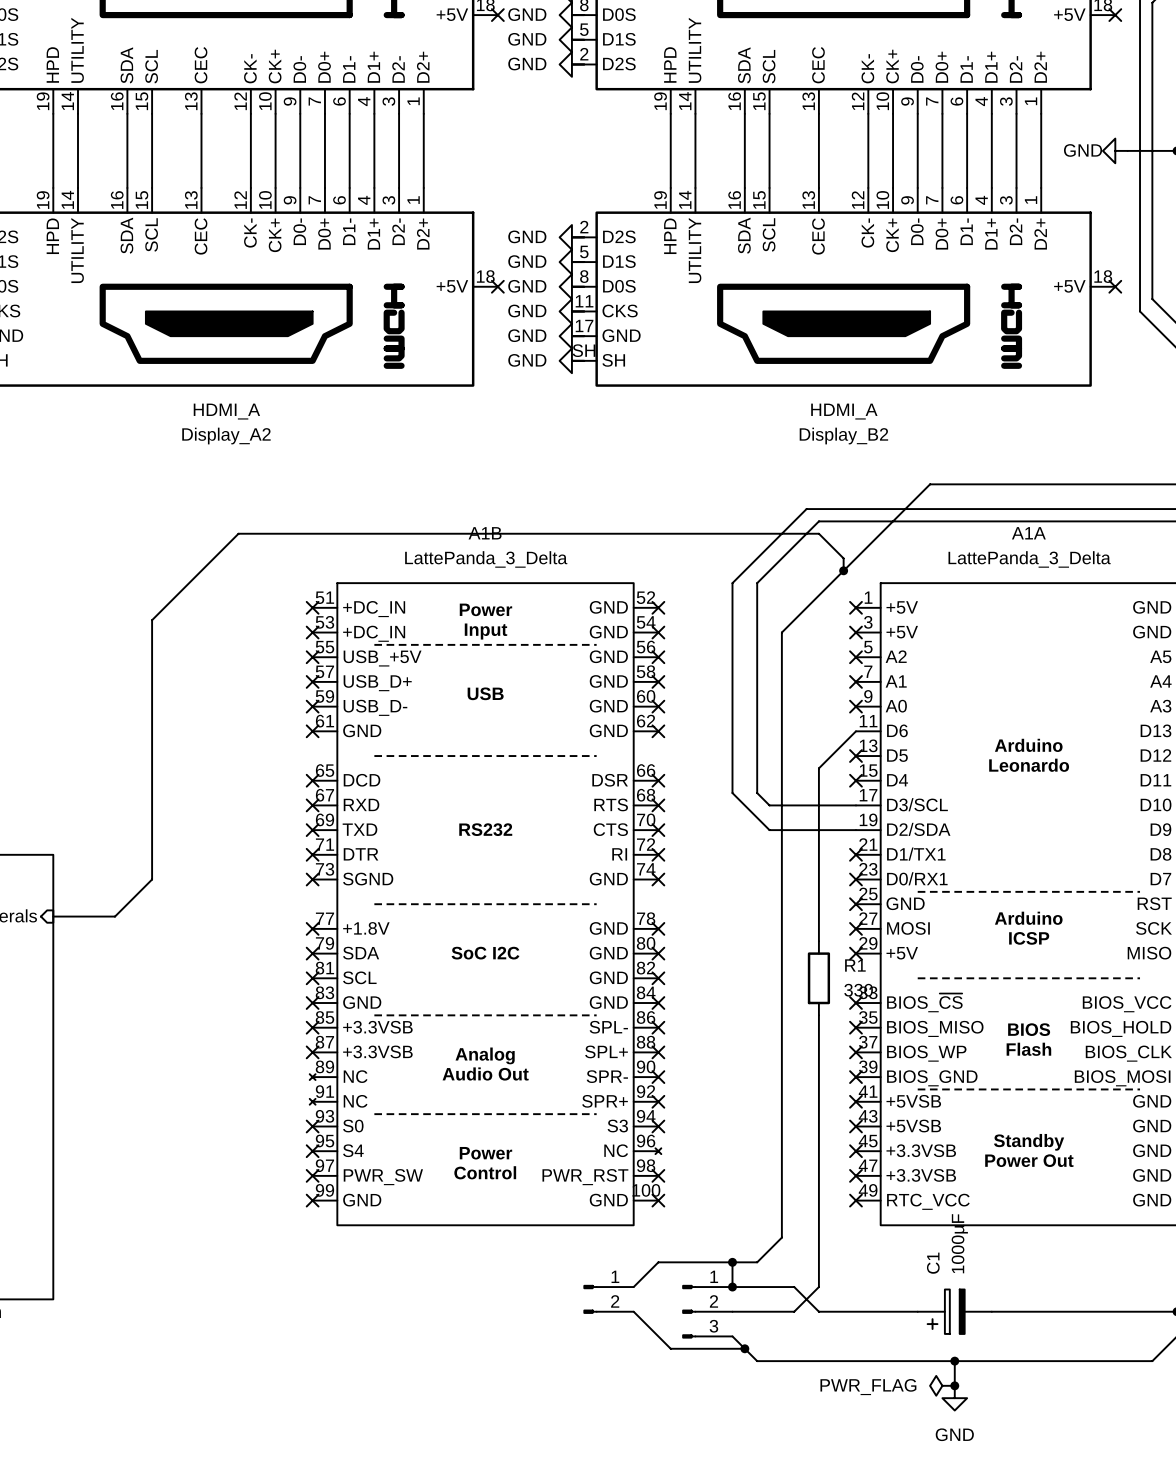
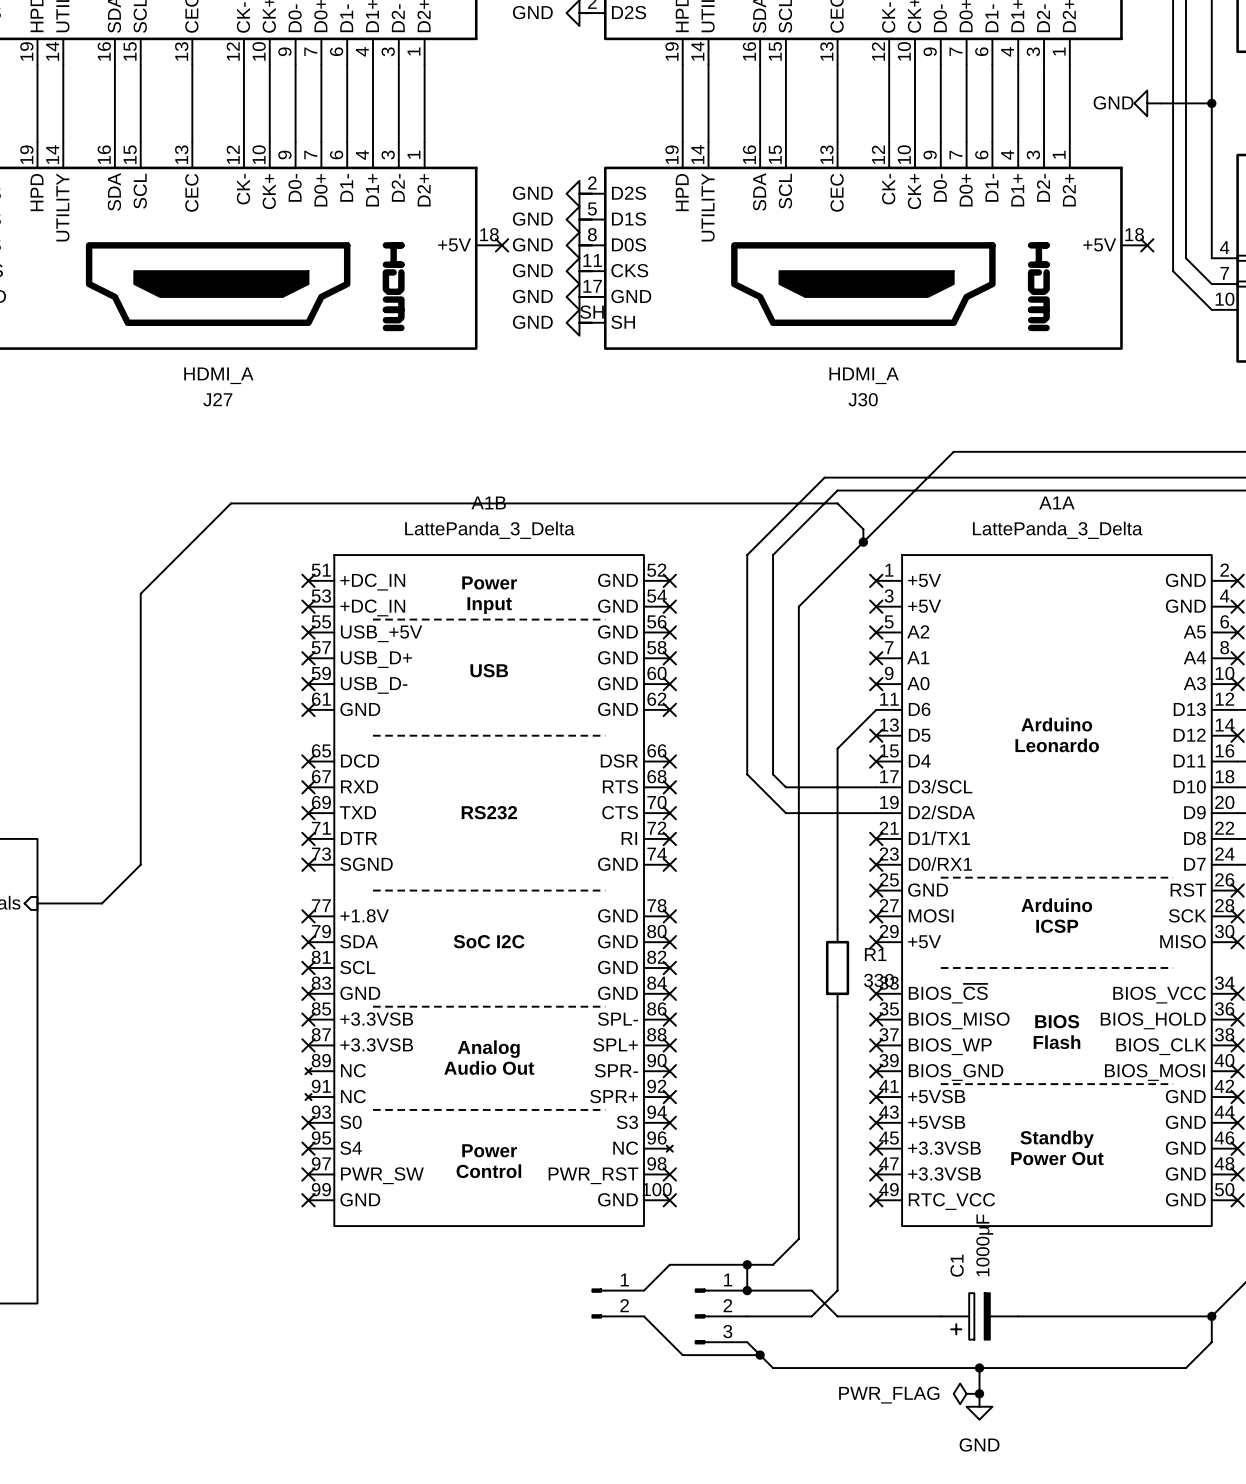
Display_A2 name: Display_A2 (226, 436) -> J27 (217, 399)
Display_B2 name: Display_B2 (843, 436) -> J30 (863, 399)

